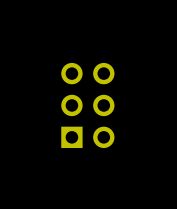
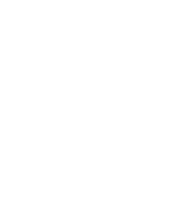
part: (87, 105) -> none

